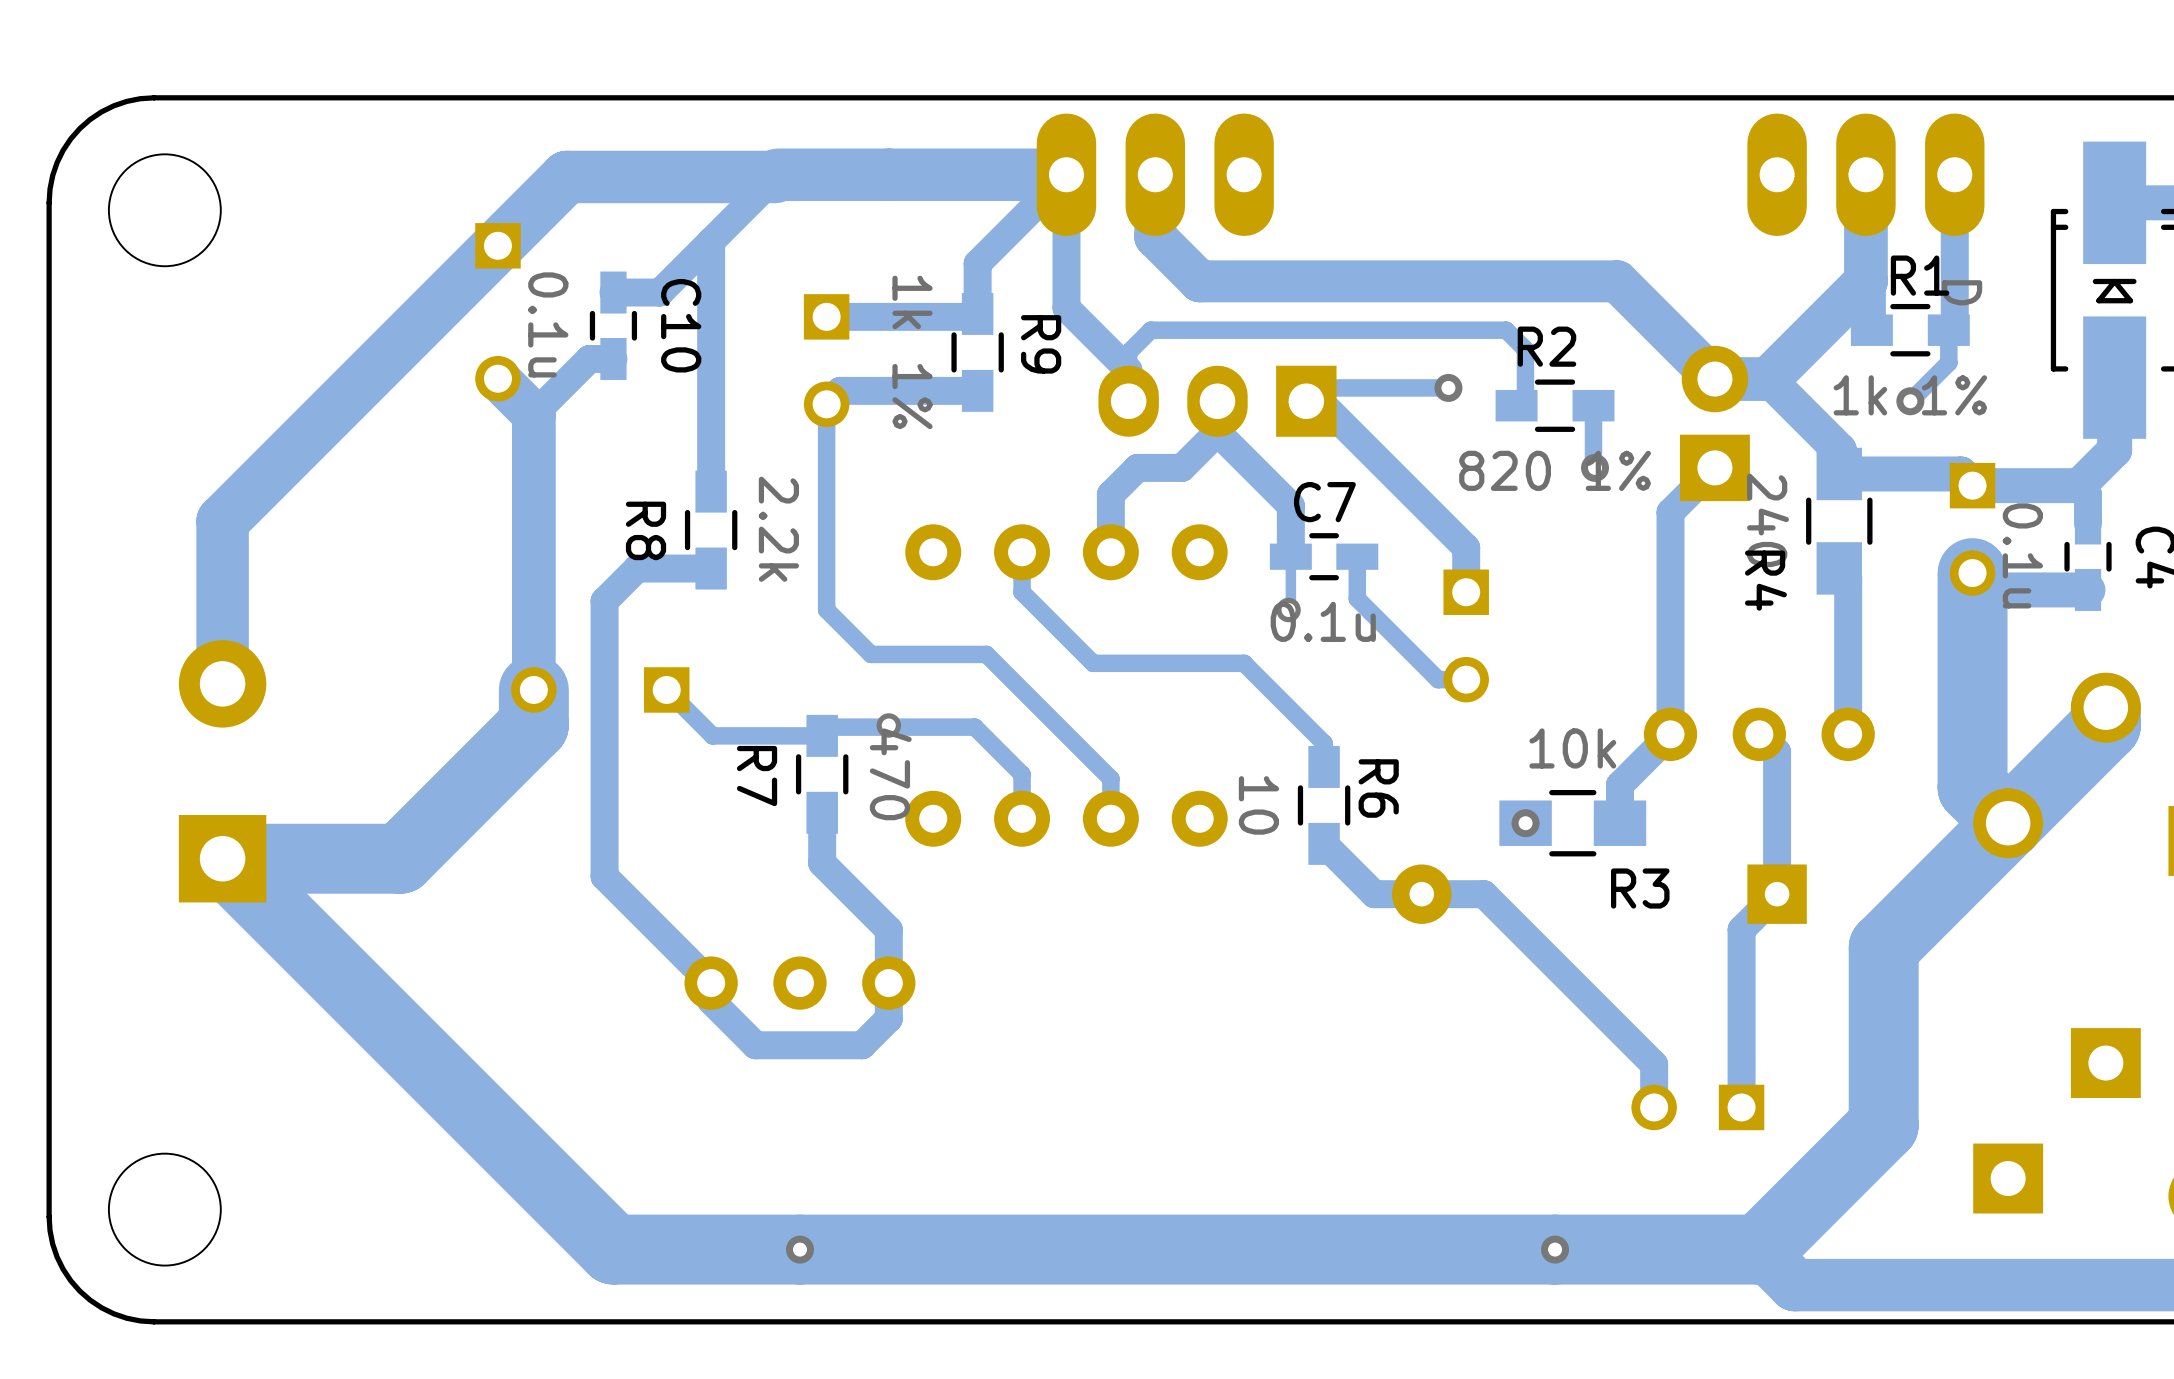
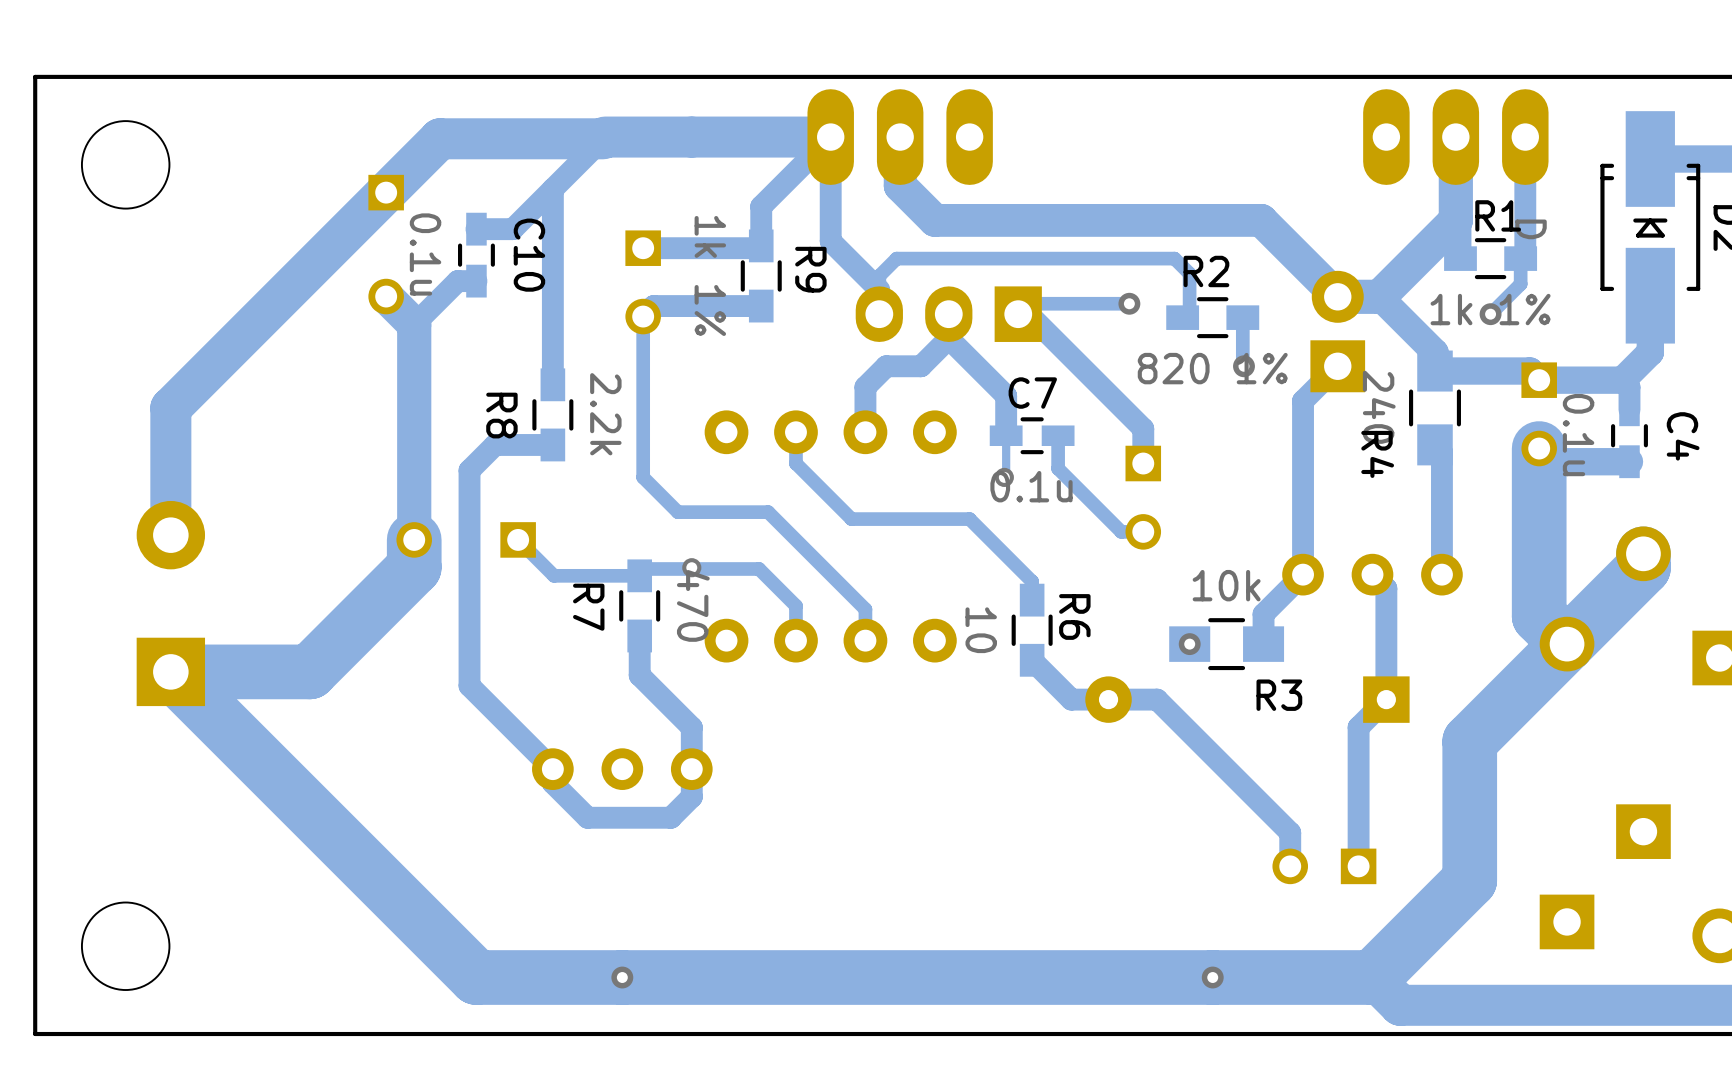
board edge: (154, 97) (140, 98) (113, 105) (90, 119) (79, 128) (70, 138) (57, 162) (50, 189) (49, 202) -> (117, 76) (35, 76) (35, 158)
board edge: (49, 1216) (50, 1230) (57, 1257) (70, 1280) (79, 1291) (90, 1300) (113, 1313) (140, 1320) (154, 1321) -> (35, 951) (35, 1034) (117, 1034)

